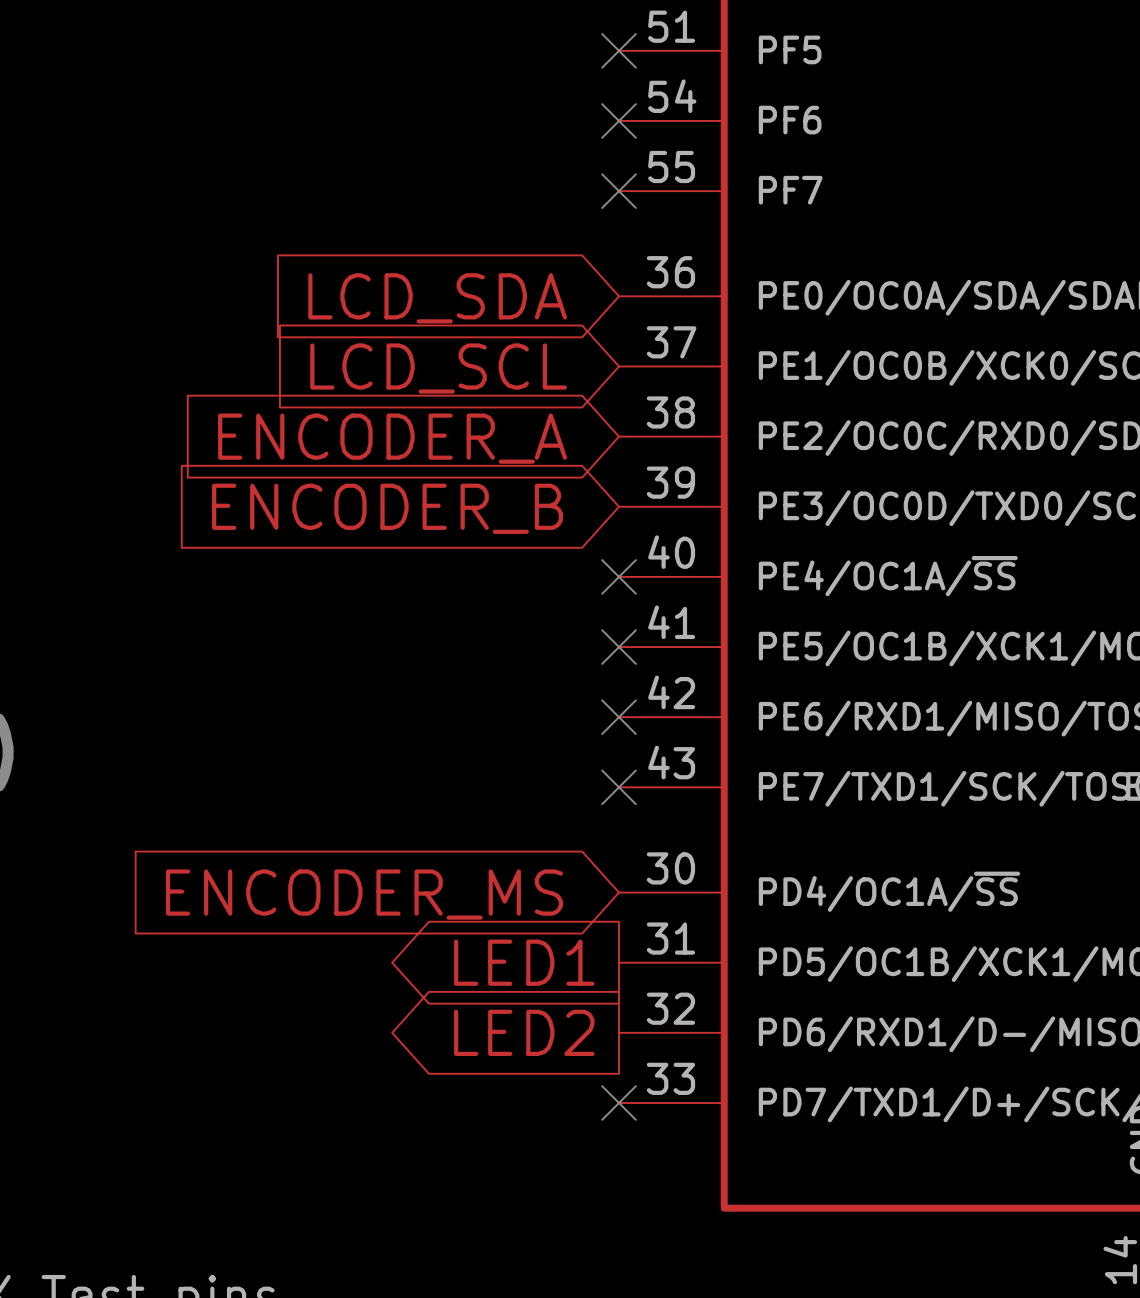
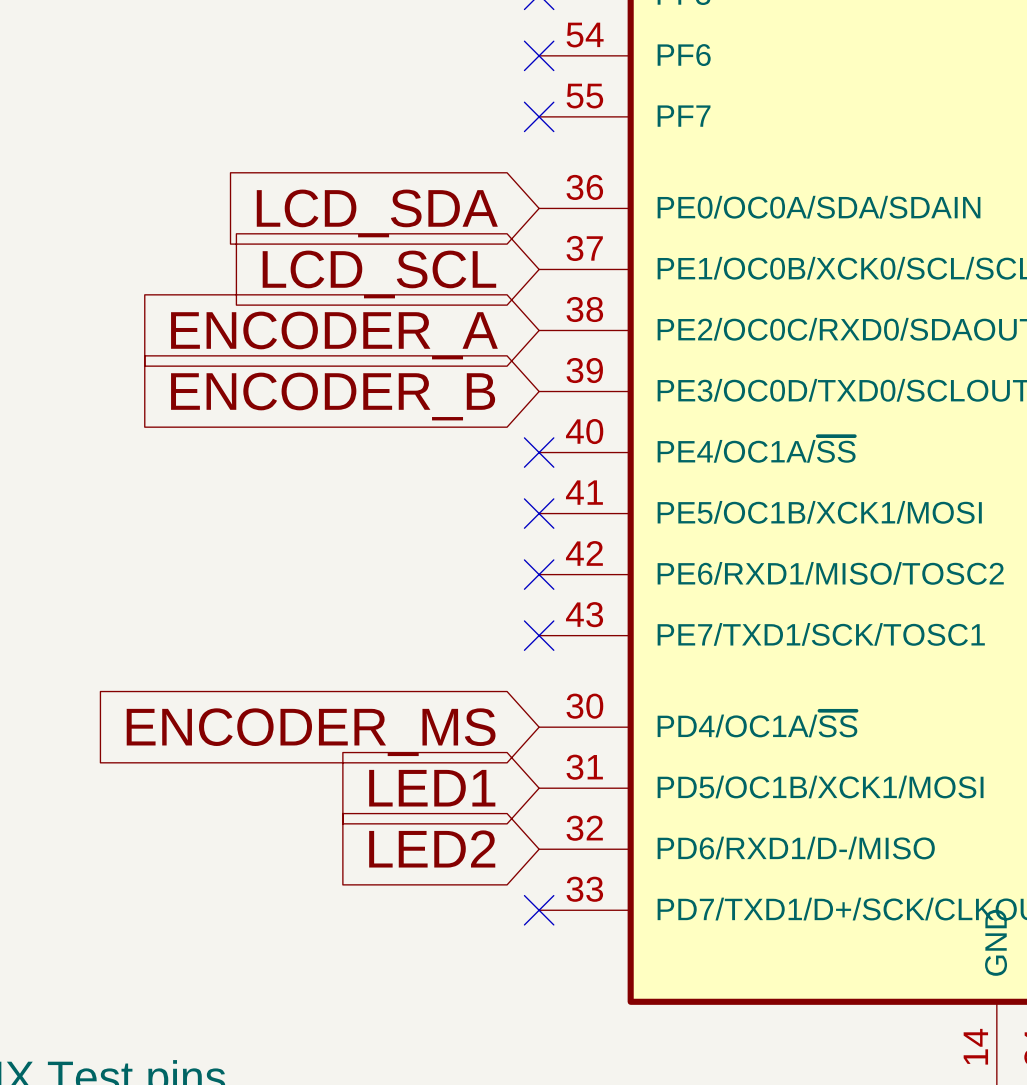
global label shape: output (524, 962) -> input (432, 788)
global label shape: output (524, 1032) -> input (432, 848)

